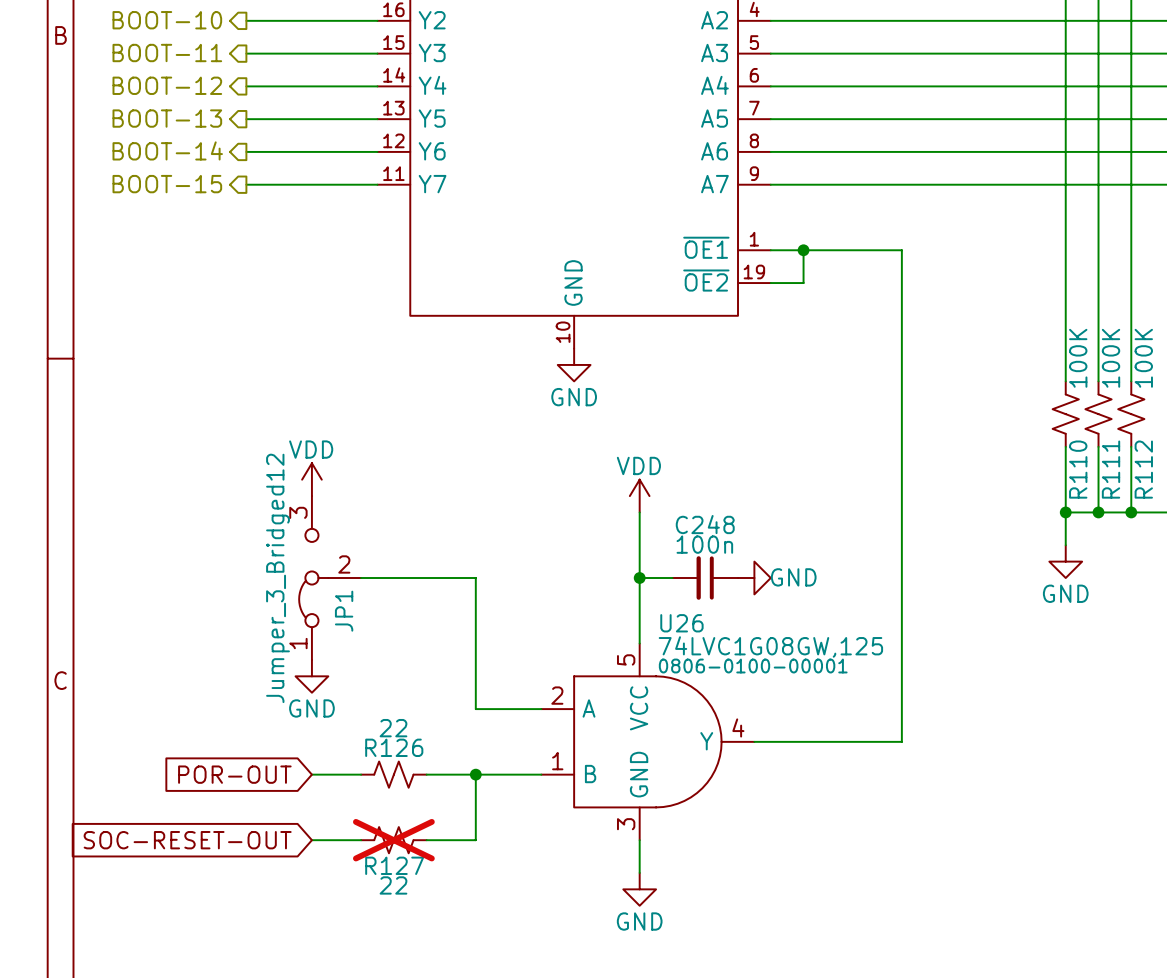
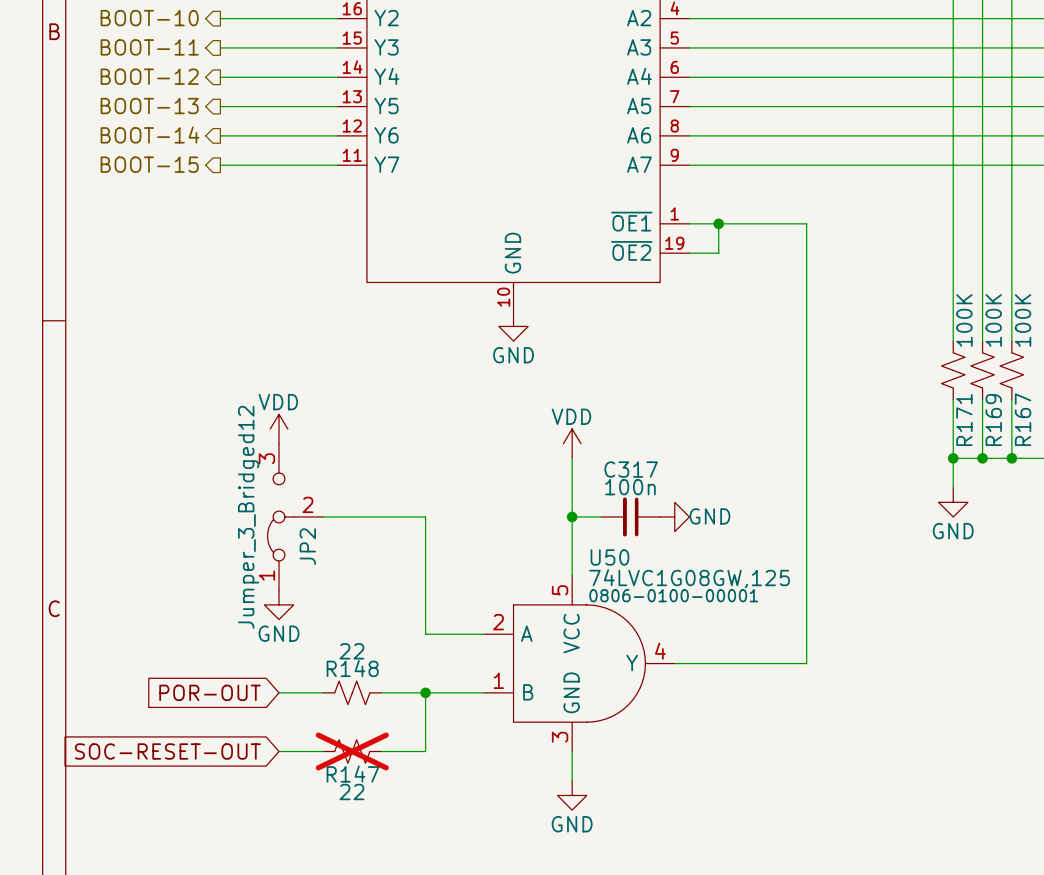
R110 name: R110 (1078, 469) -> R171 (964, 420)
R111 name: R111 (1111, 469) -> R169 (993, 420)
R112 name: R112 (1143, 469) -> R167 (1023, 419)
C248 name: C248 (705, 524) -> C317 (631, 469)
JP1 name: JP1 (344, 611) -> JP2 (307, 546)
U26 name: U26 (681, 623) -> U50 (609, 557)
R126 name: R126 (394, 747) -> R148 (352, 668)
R127 name: R127 (394, 865) -> R147 (353, 774)

